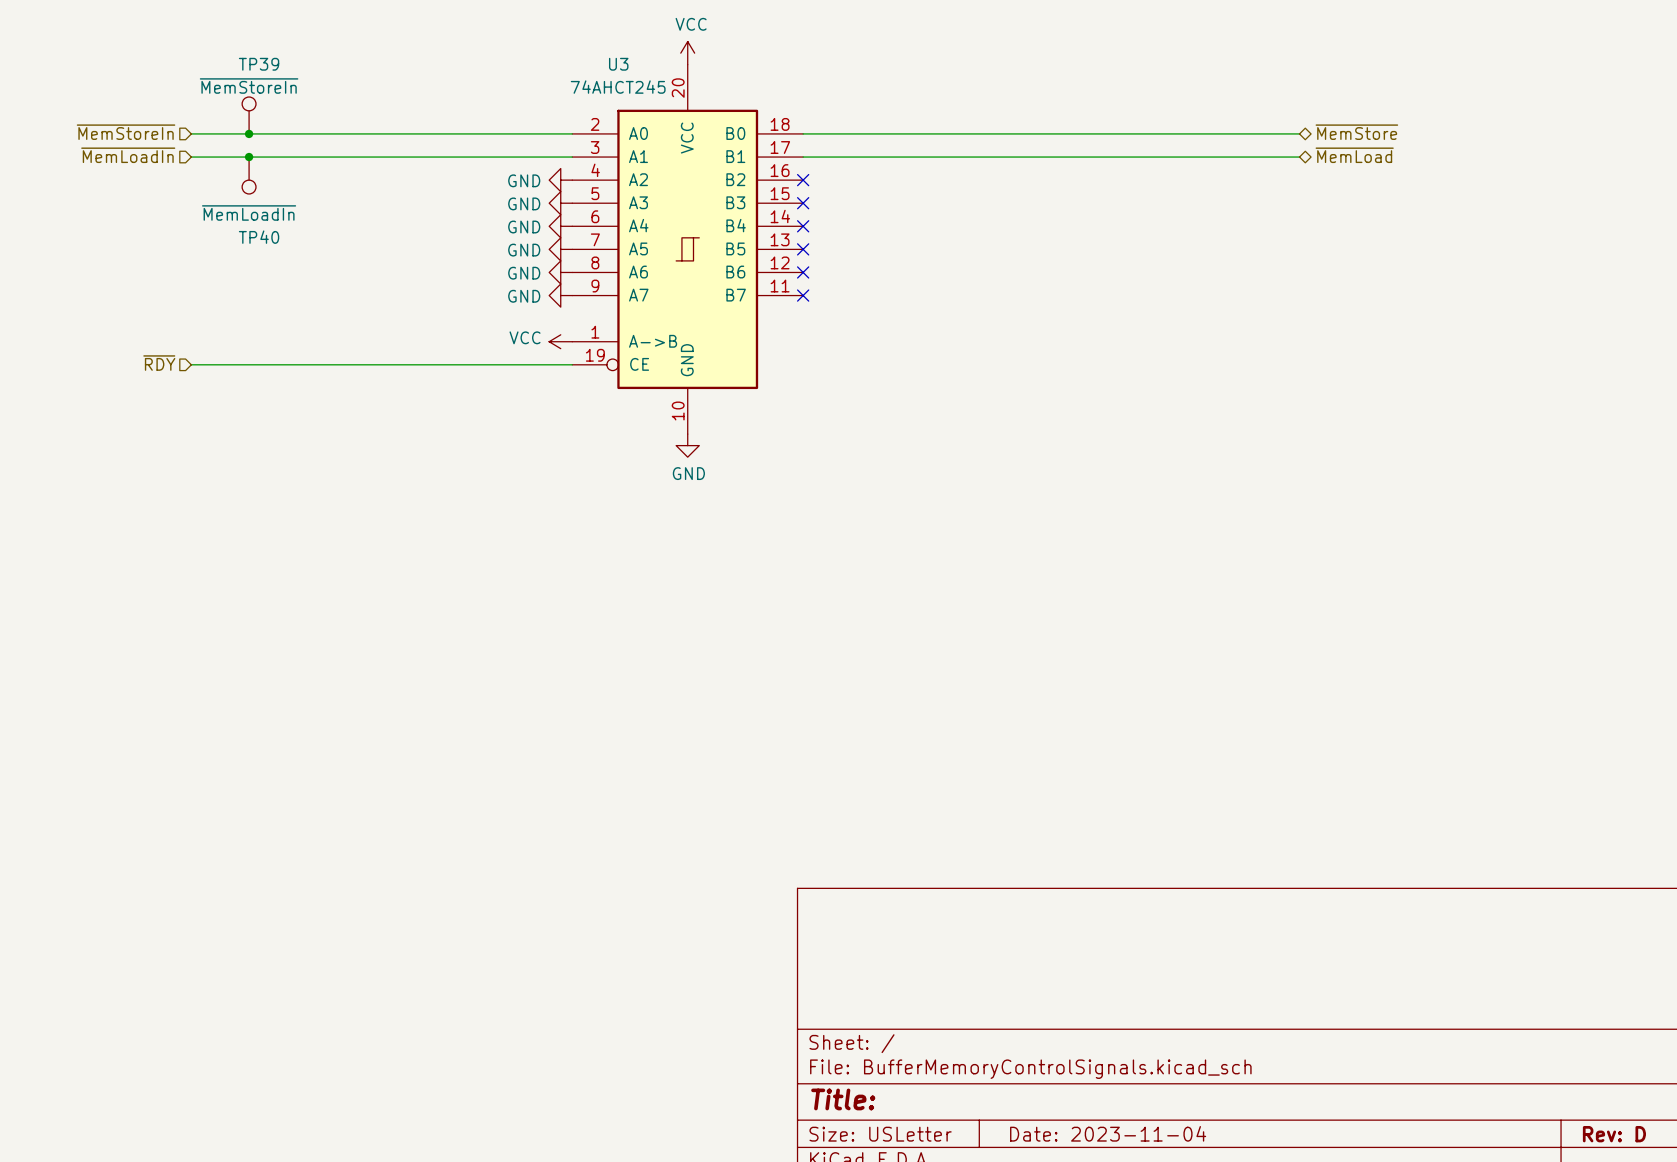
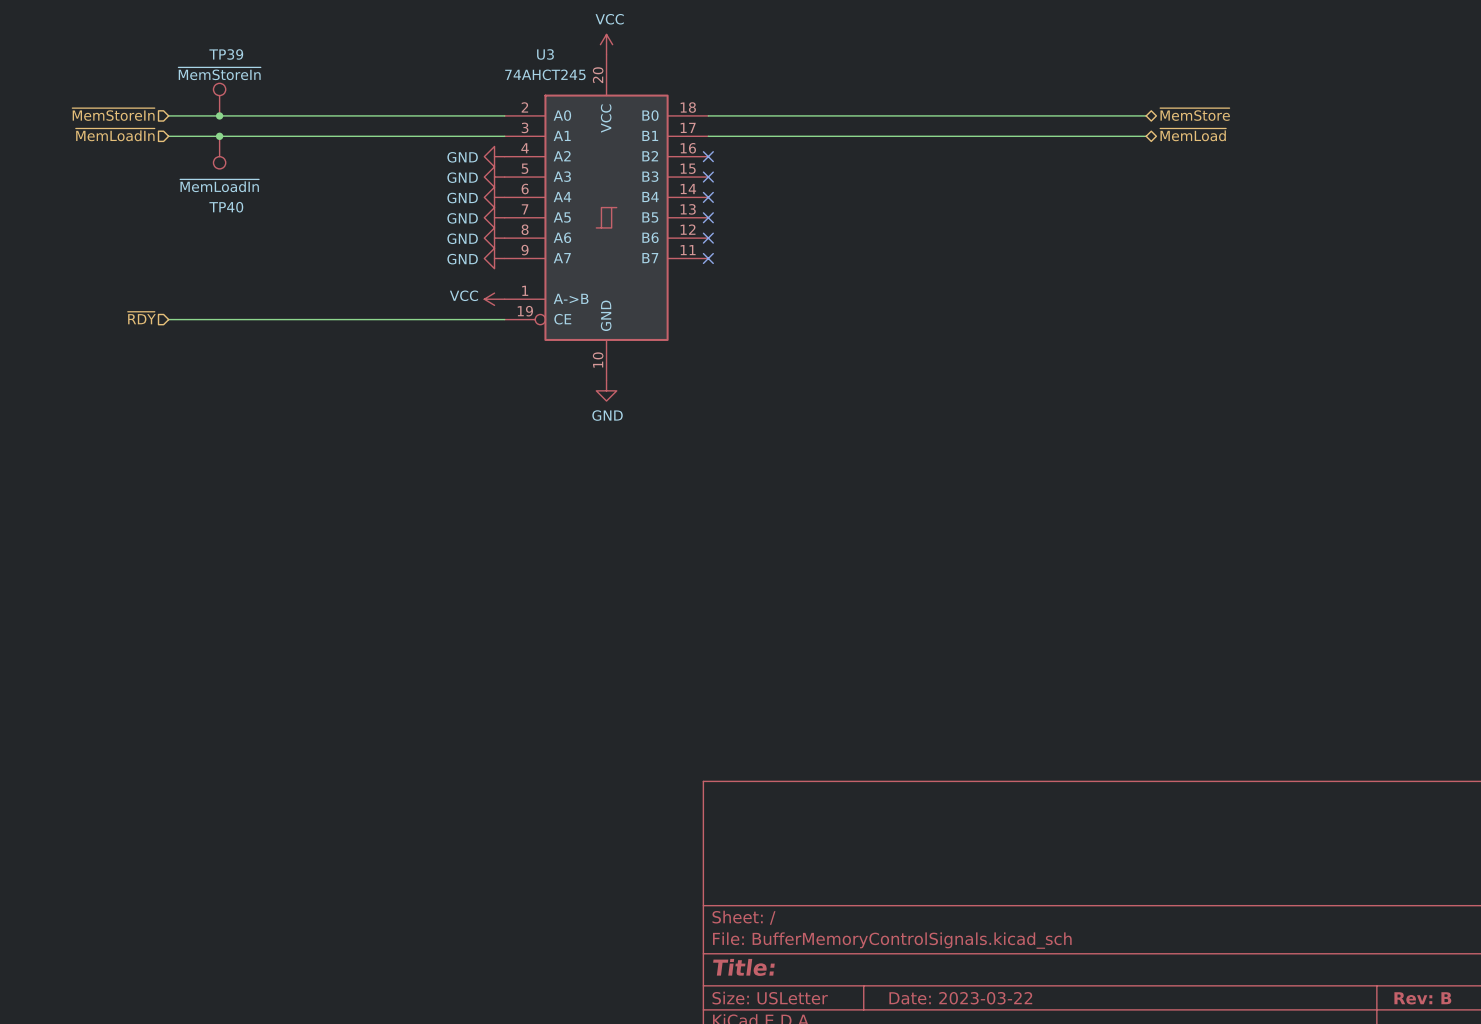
title block: Date: 2023-11-04 (1108, 1133) -> Date: 2023-03-22 (960, 998)
title block: Rev: D (1614, 1134) -> Rev: B (1422, 998)

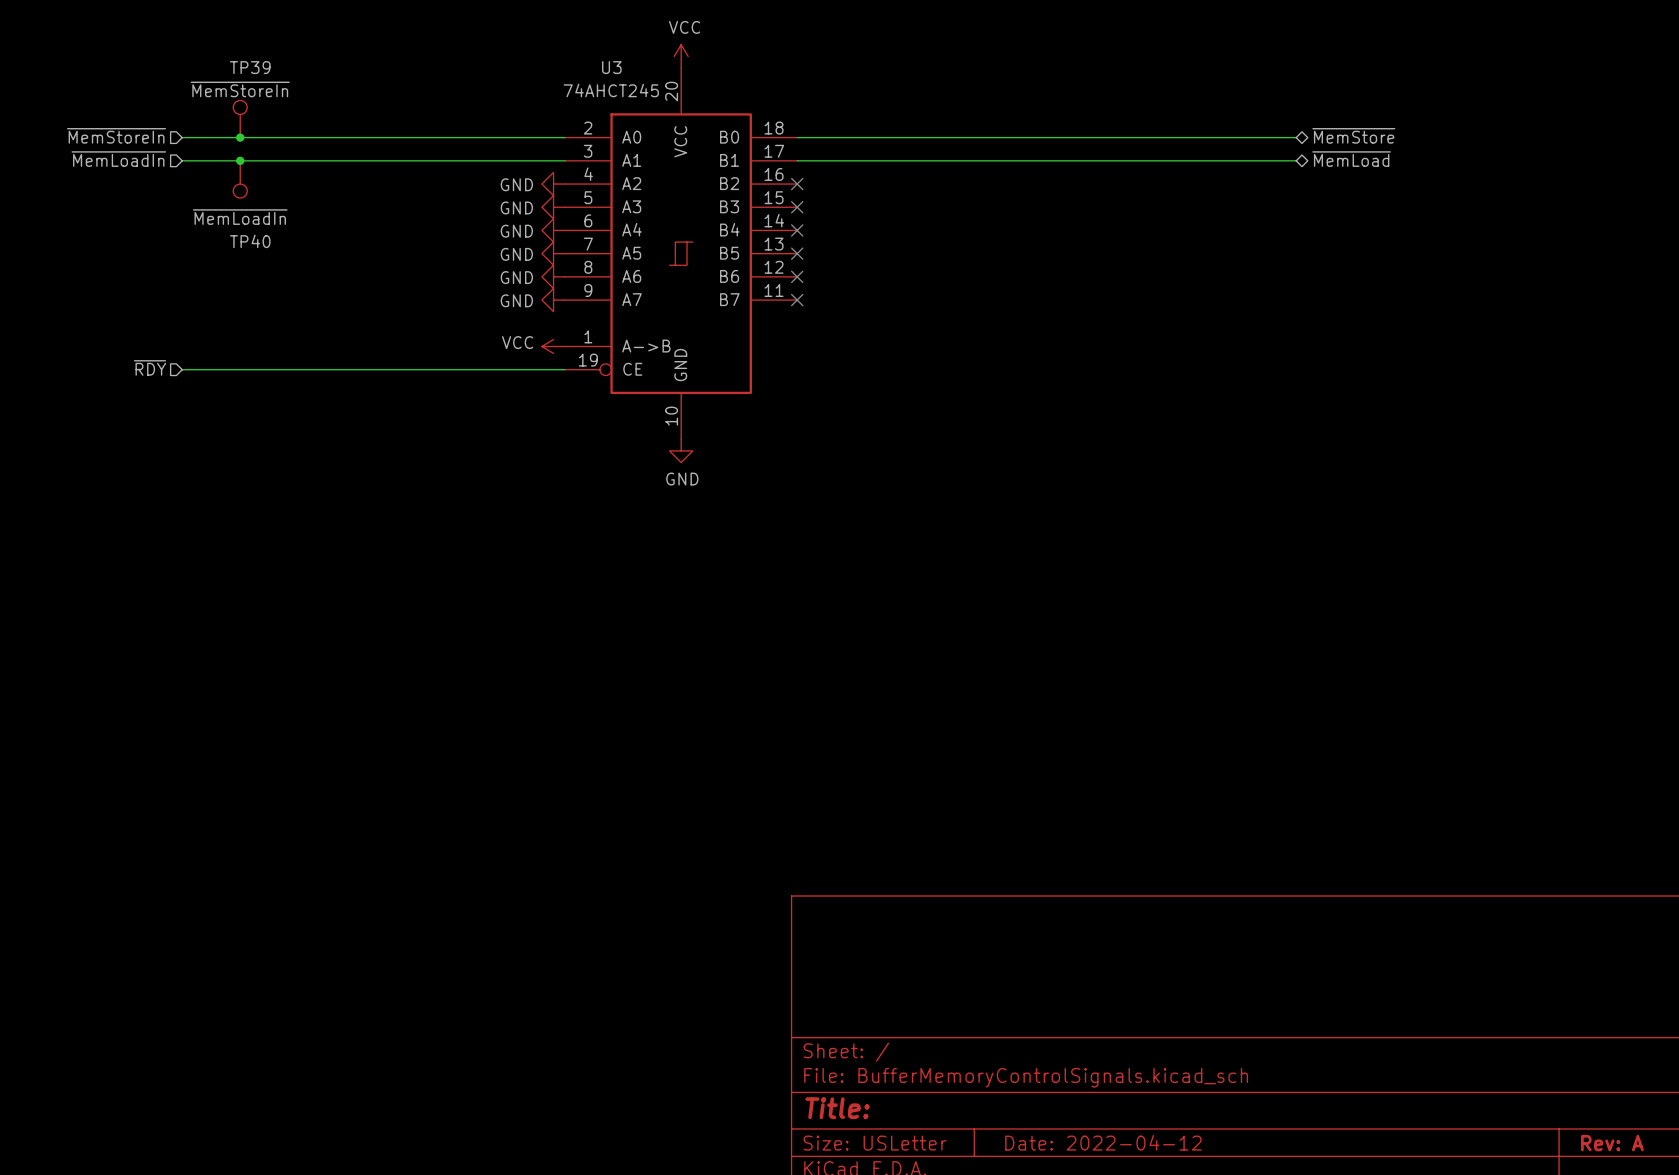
title block: Date: 2023-03-22 (960, 998) -> Date: 2022-04-12 (1103, 1142)
title block: Rev: B (1422, 998) -> Rev: A (1612, 1143)

